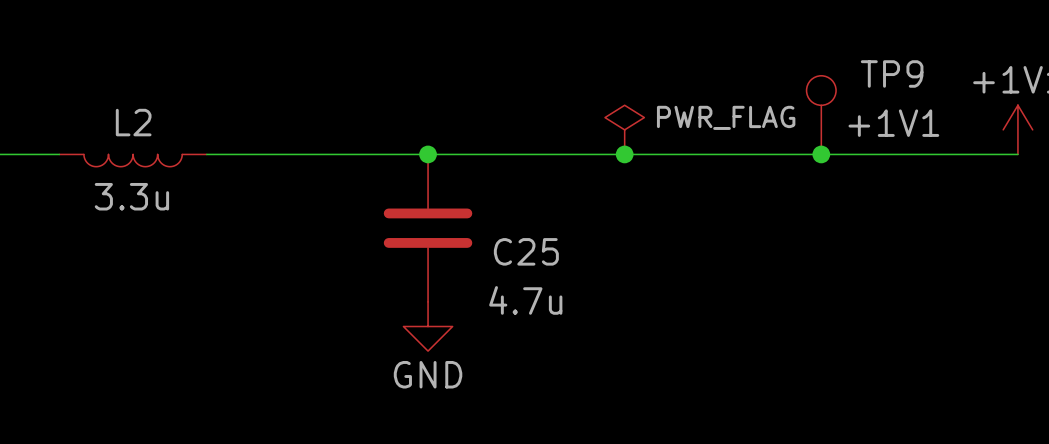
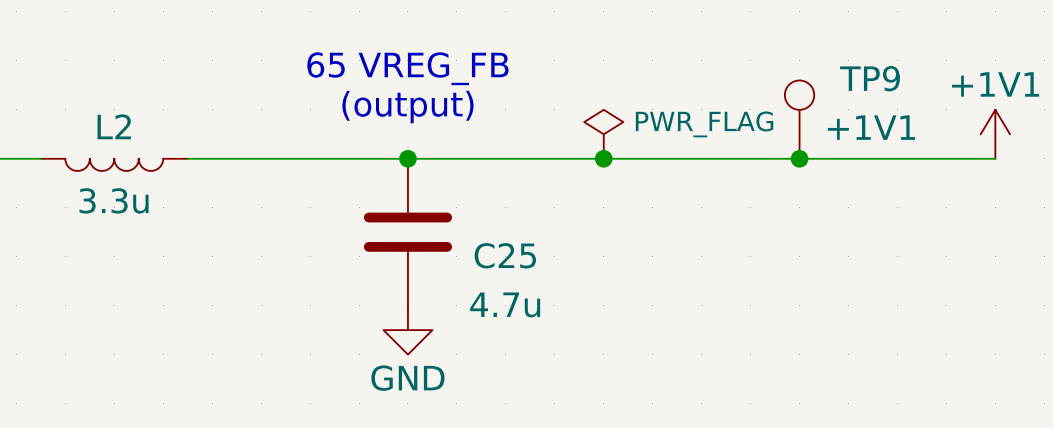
text: none -> 65 VREG_FB (407, 68)
text: none -> (output) (407, 107)

